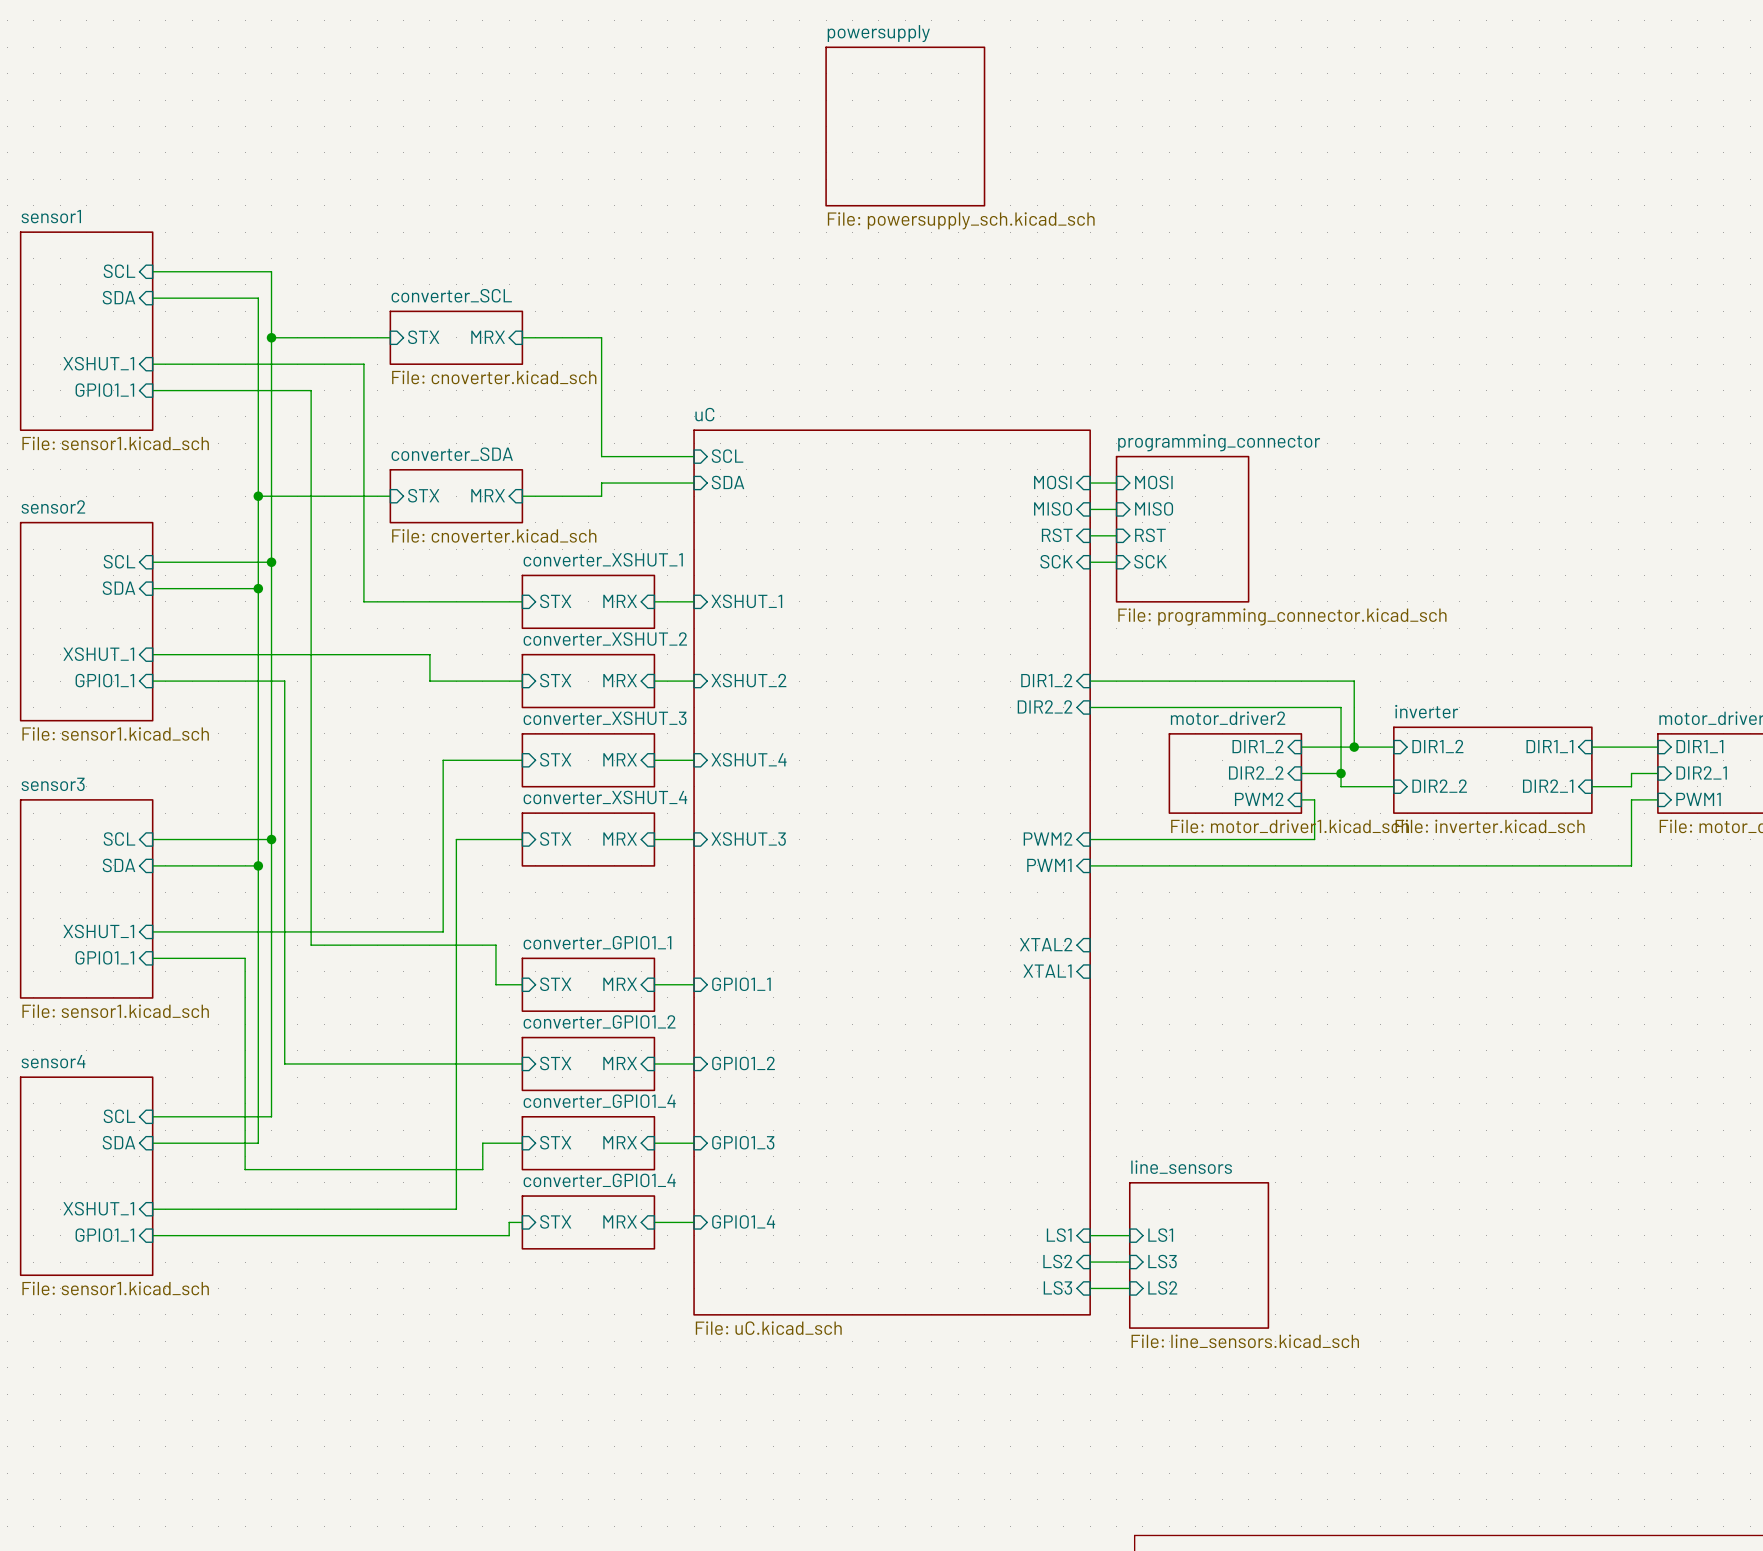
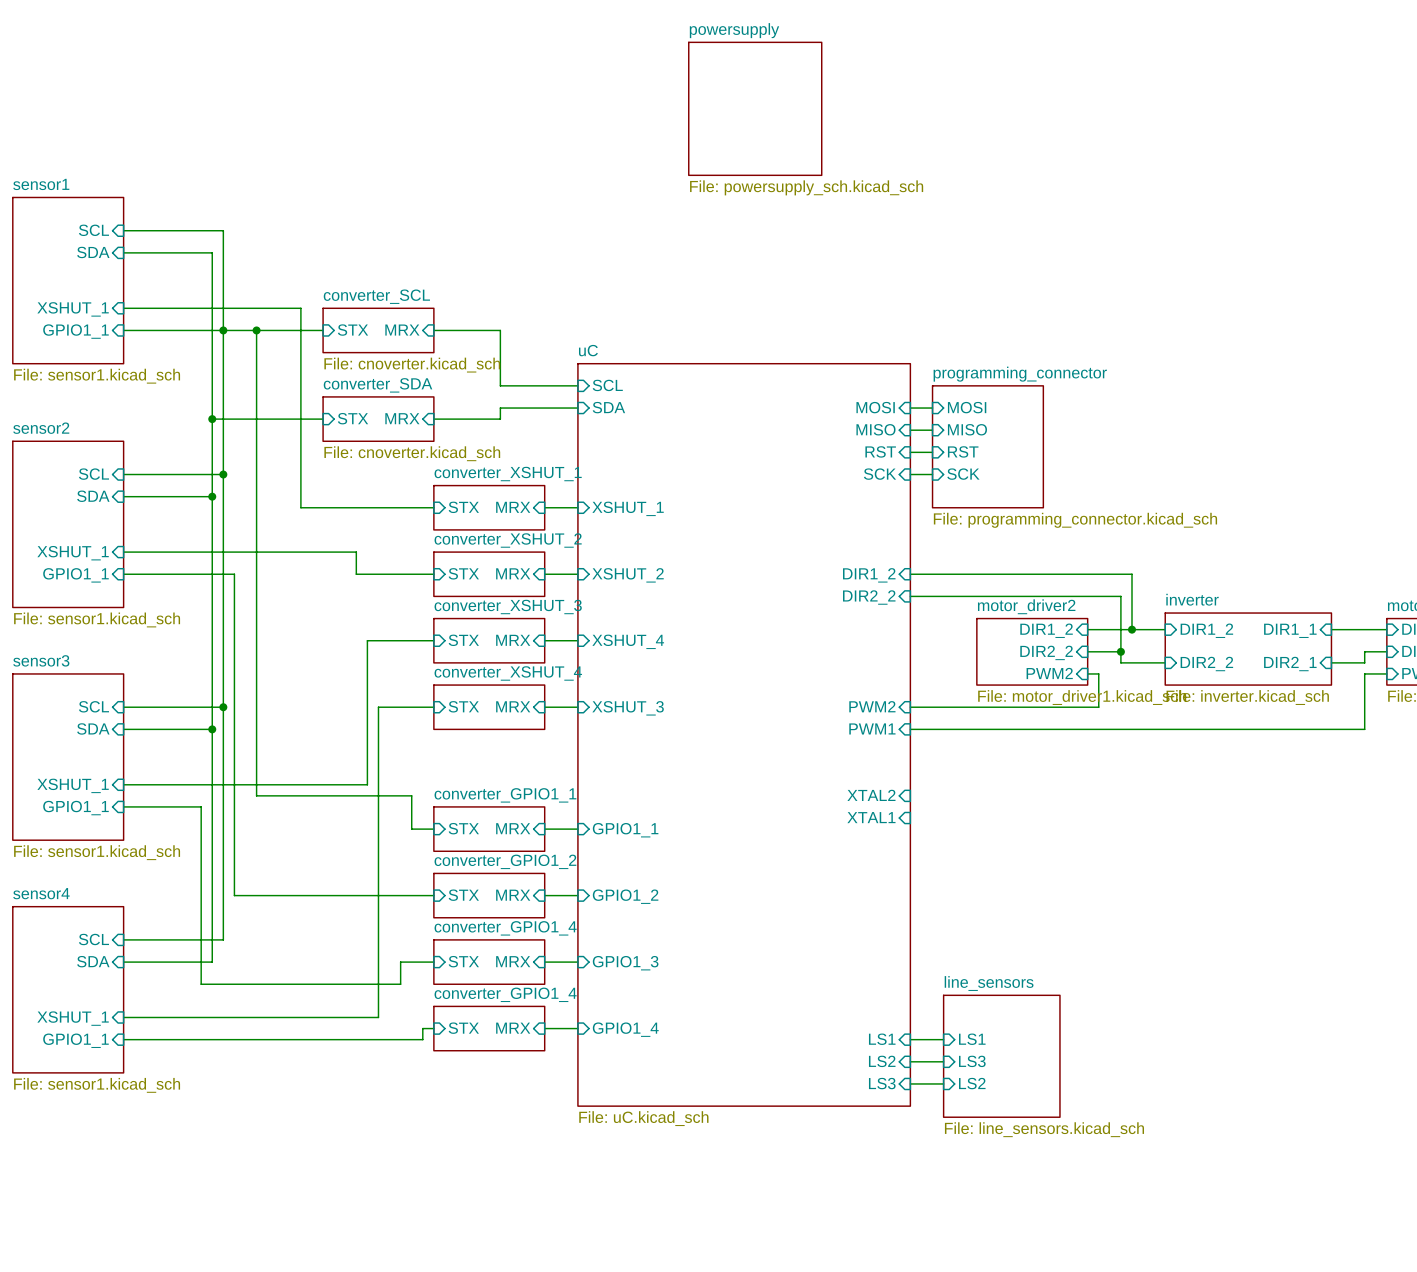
wire: (271, 337) (390, 337) -> none
junction: (271, 337) -> none
sheet pin position: STX (423, 337) -> STX (353, 330)
sheet converter_SCL position: (456, 337) -> (378, 330)
sheet pin position: MRX (488, 337) -> MRX (402, 330)
wire: (522, 337) (601, 337) (601, 390) -> (433, 330) (500, 330)
junction: none -> (223, 330)
wire: none -> (256, 330) (323, 330)
junction: none -> (256, 330)

